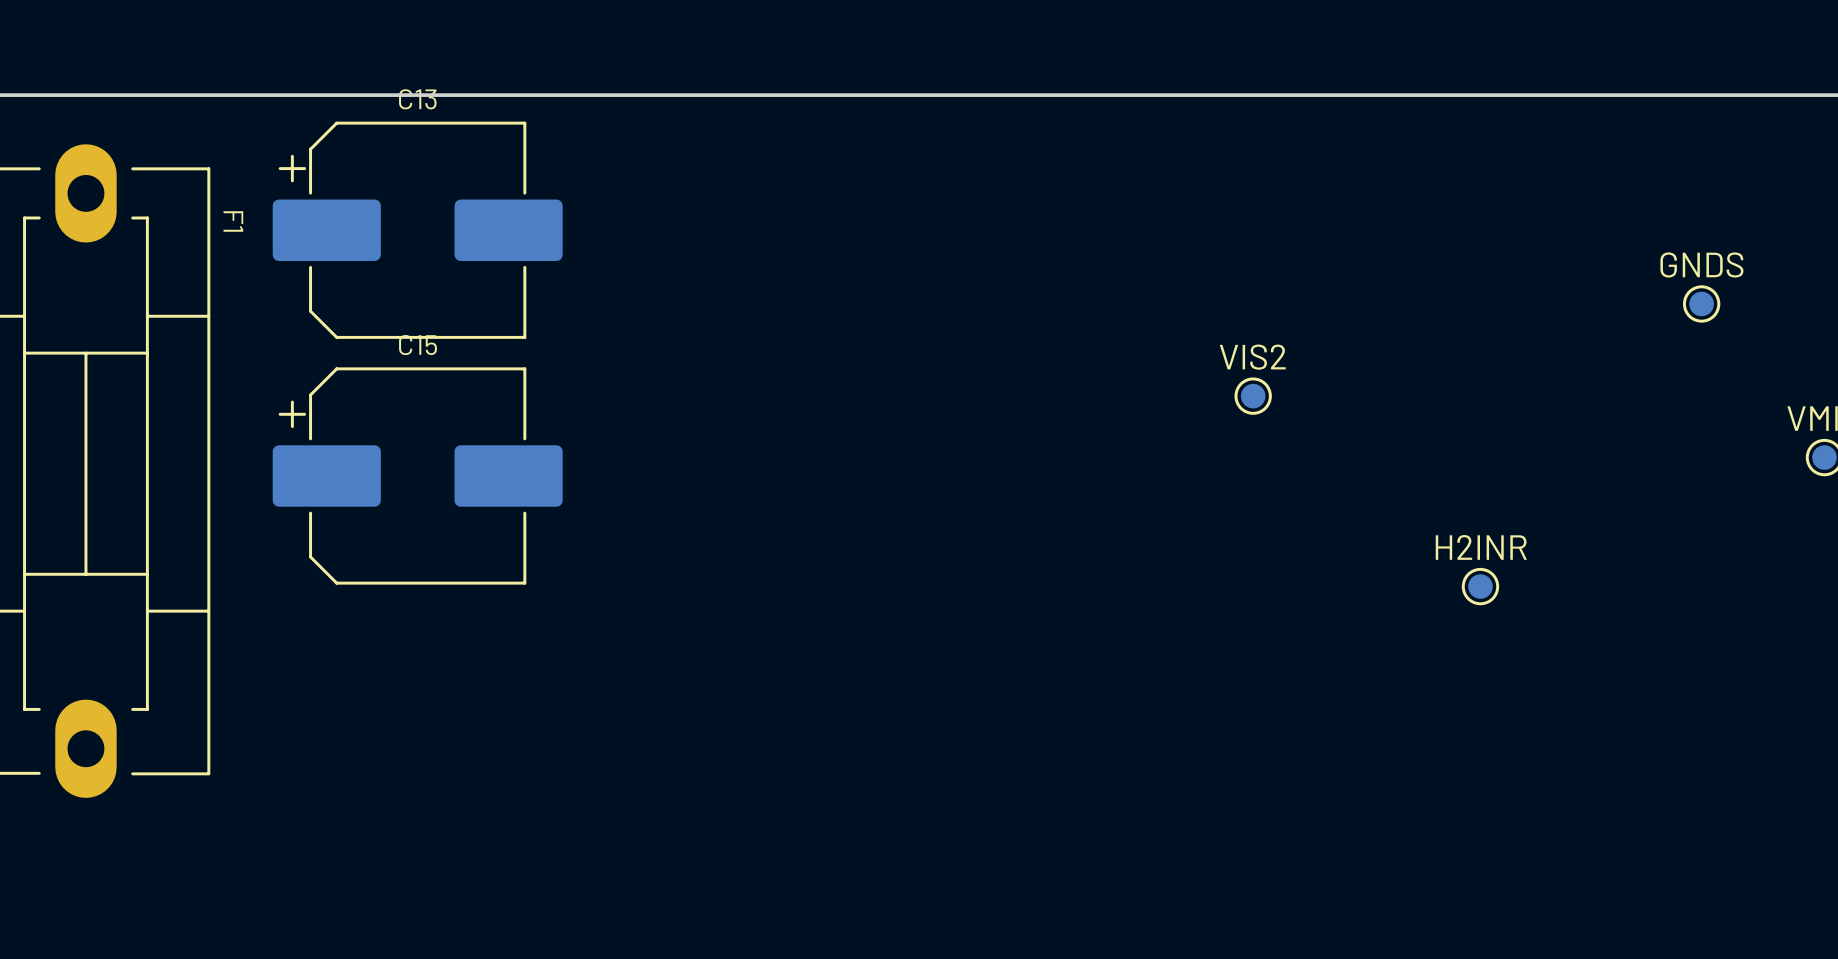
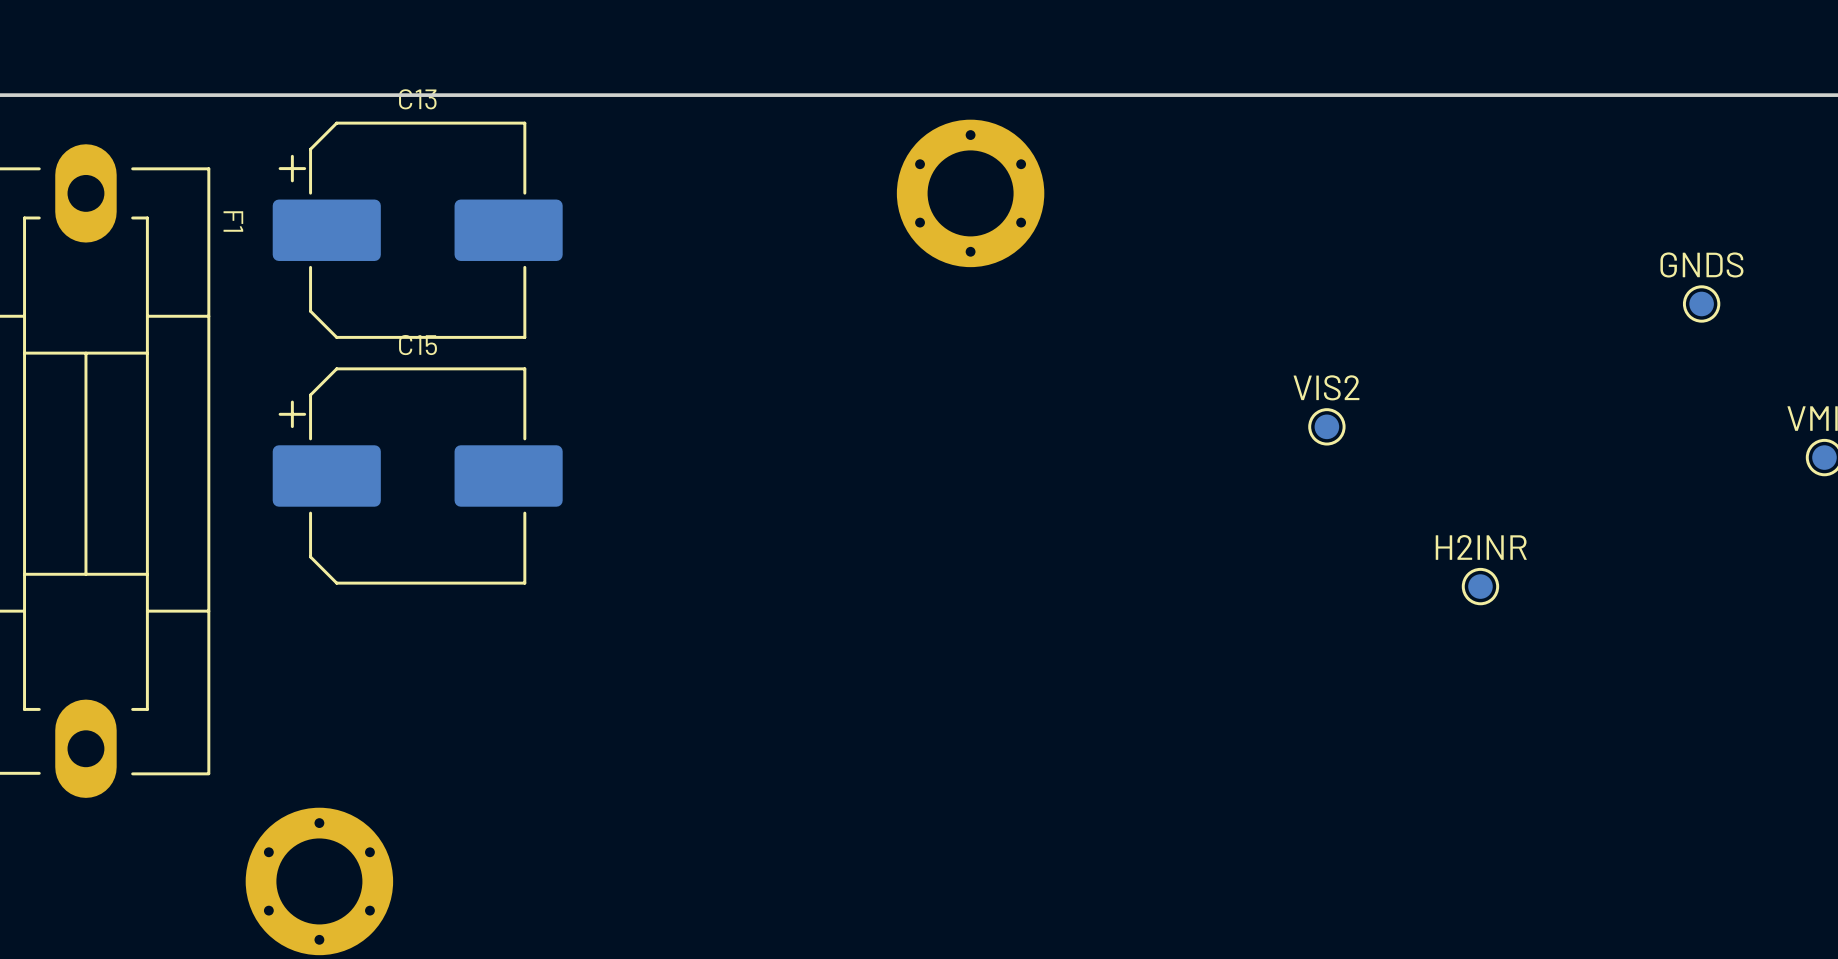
part: none -> (970, 193)
part position: (1253, 396) -> (1326, 426)
part: none -> (319, 881)

